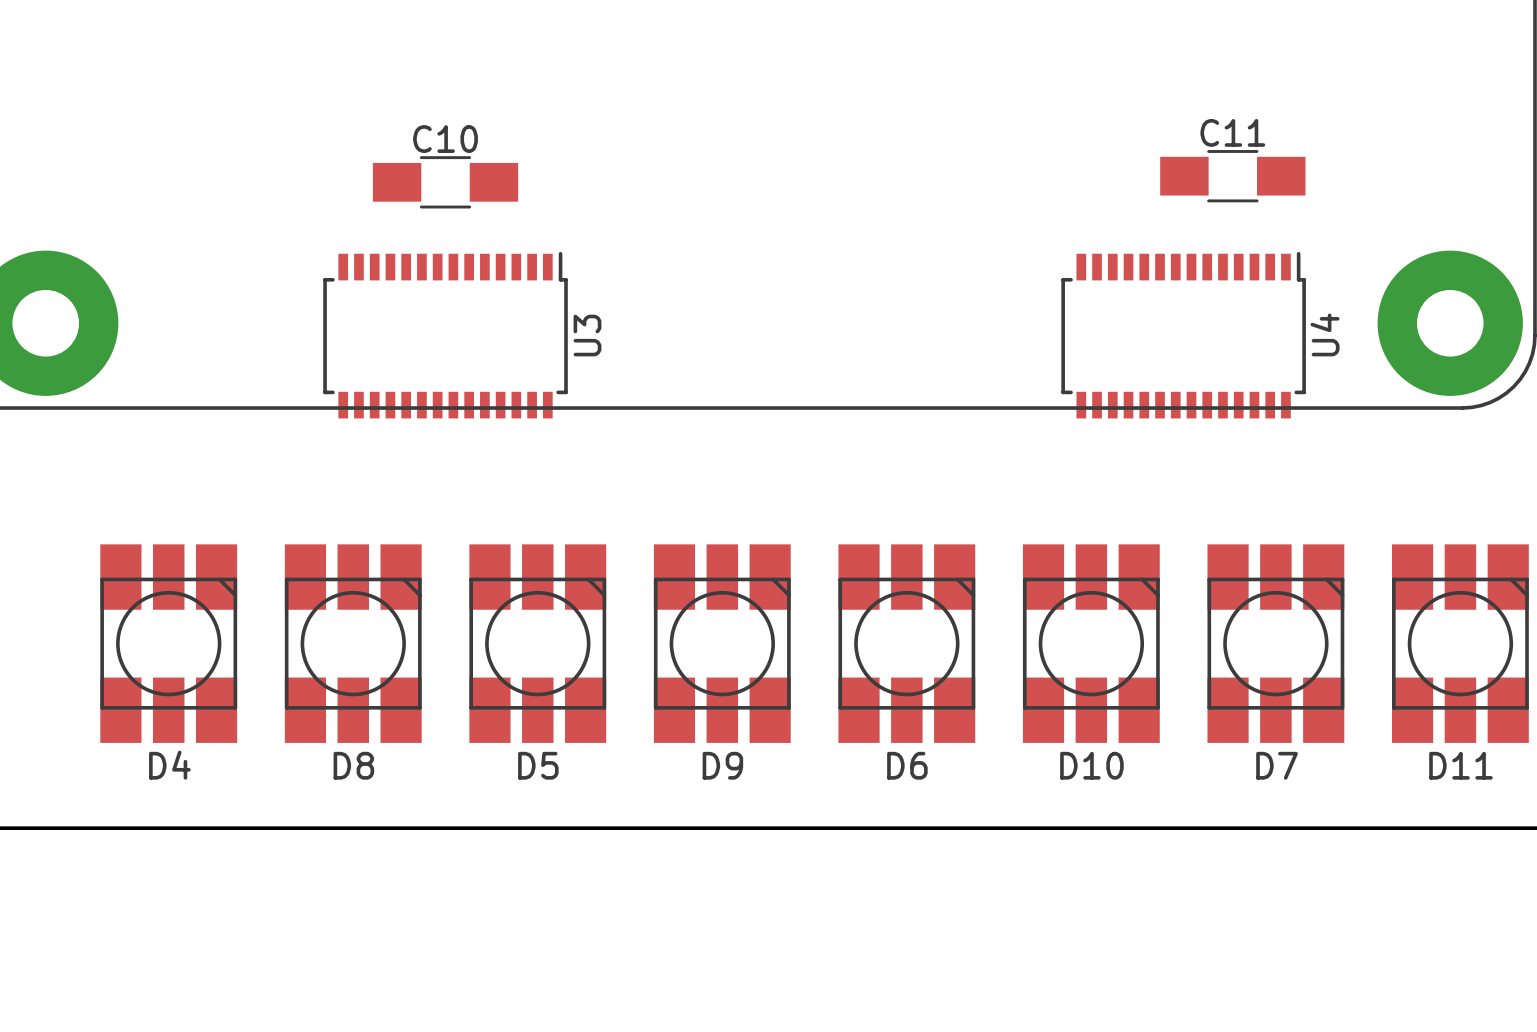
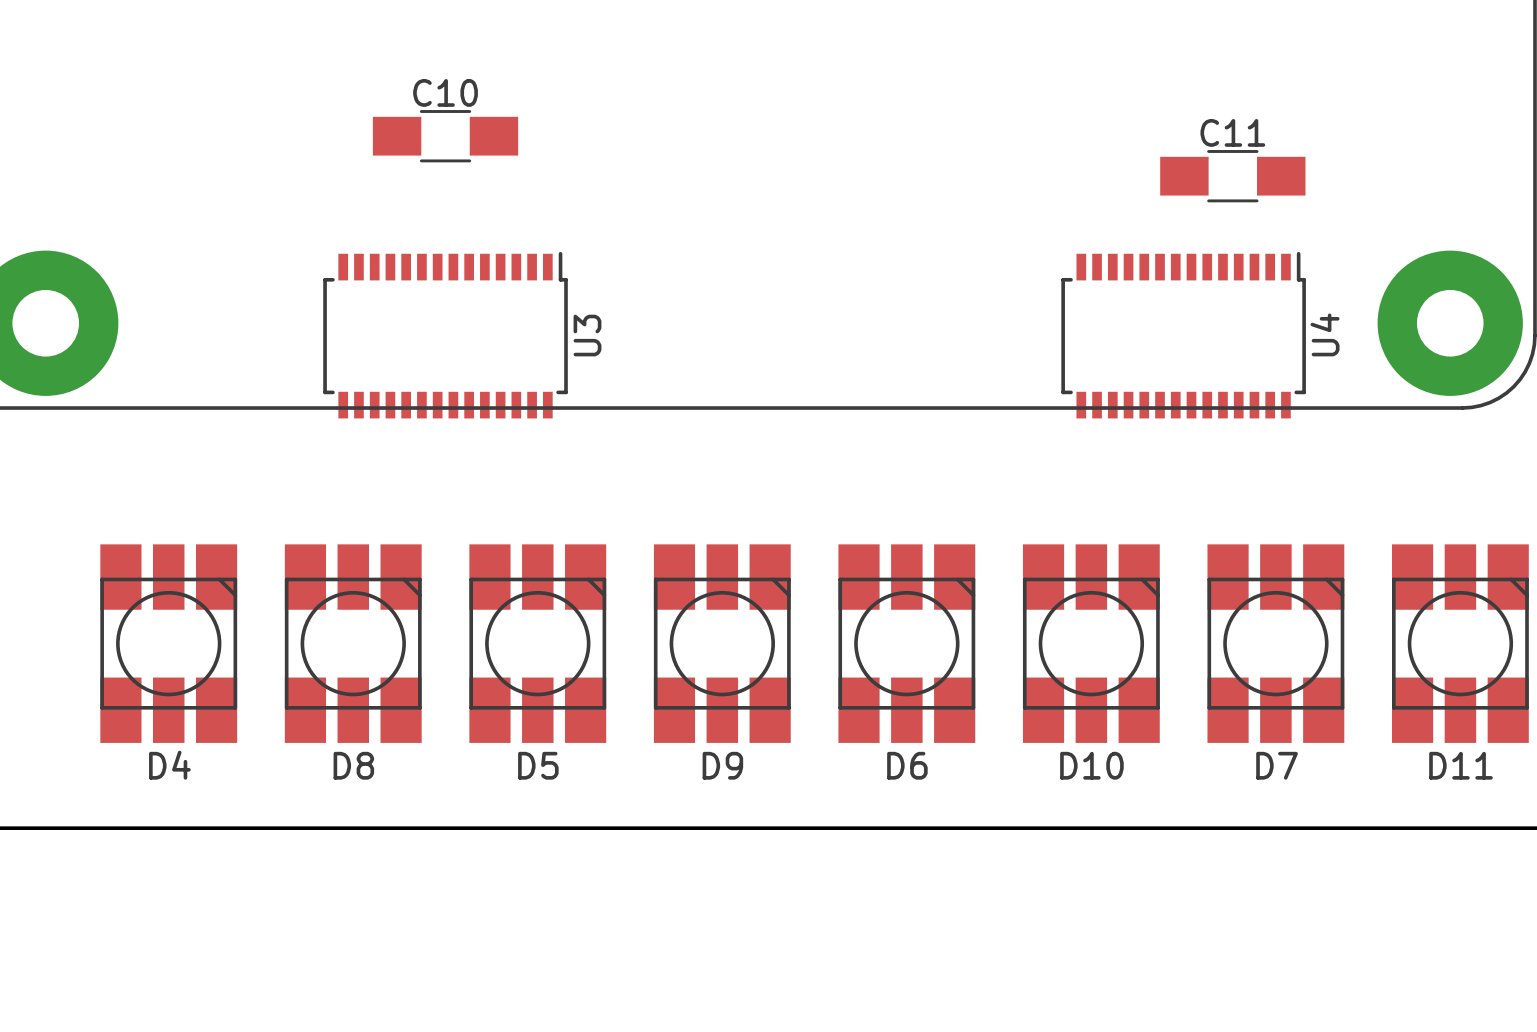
C10 position: (445, 182) -> (445, 136)

